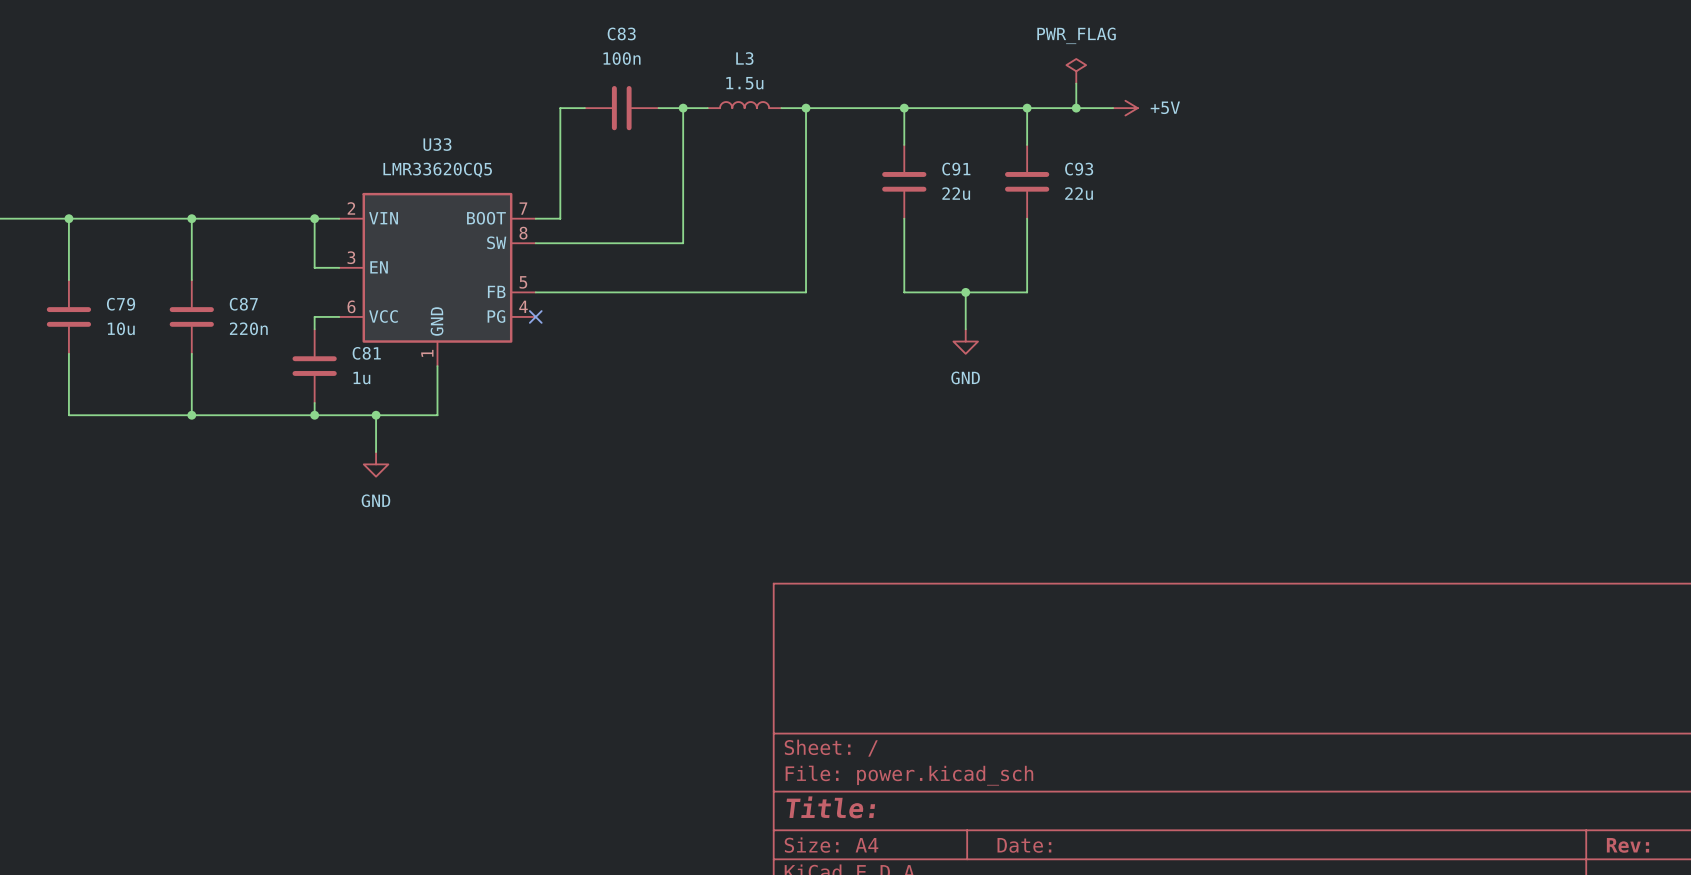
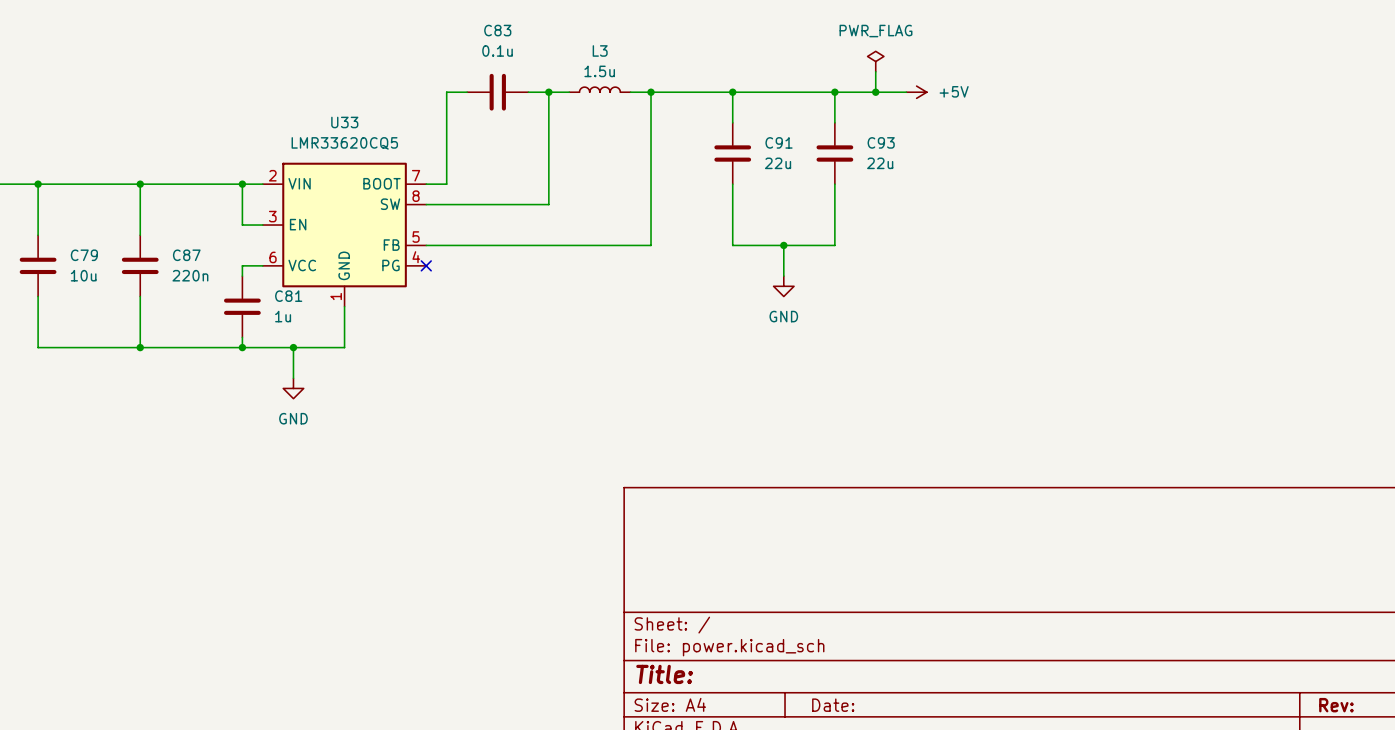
C83 value: 100n (622, 58) -> 0.1u (497, 50)

